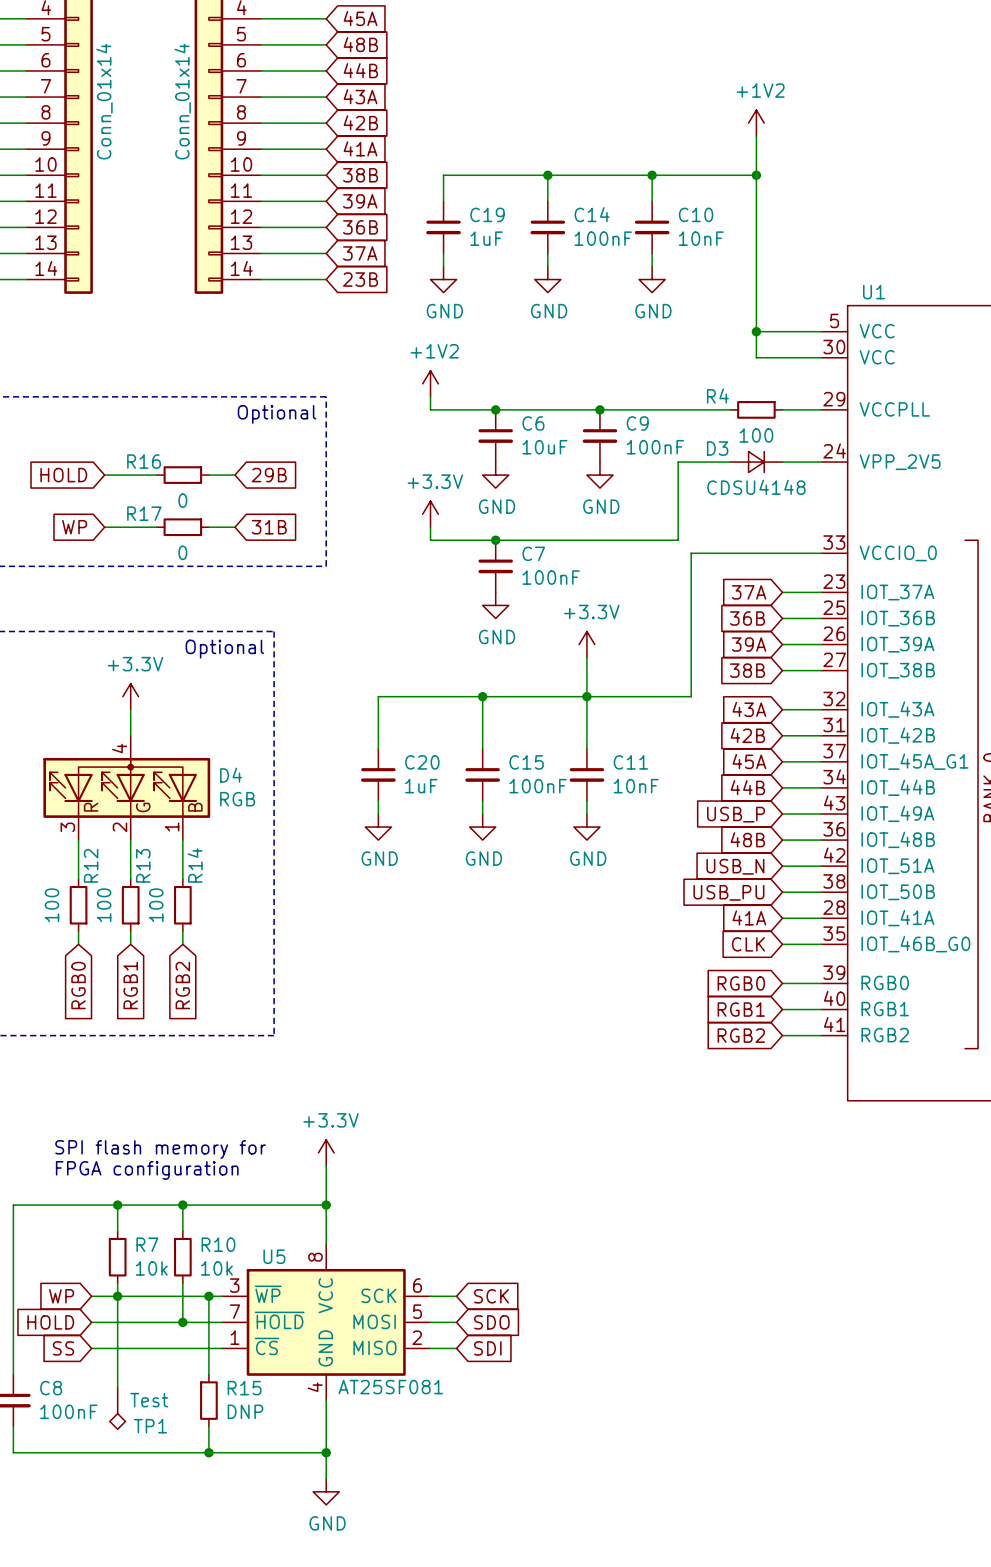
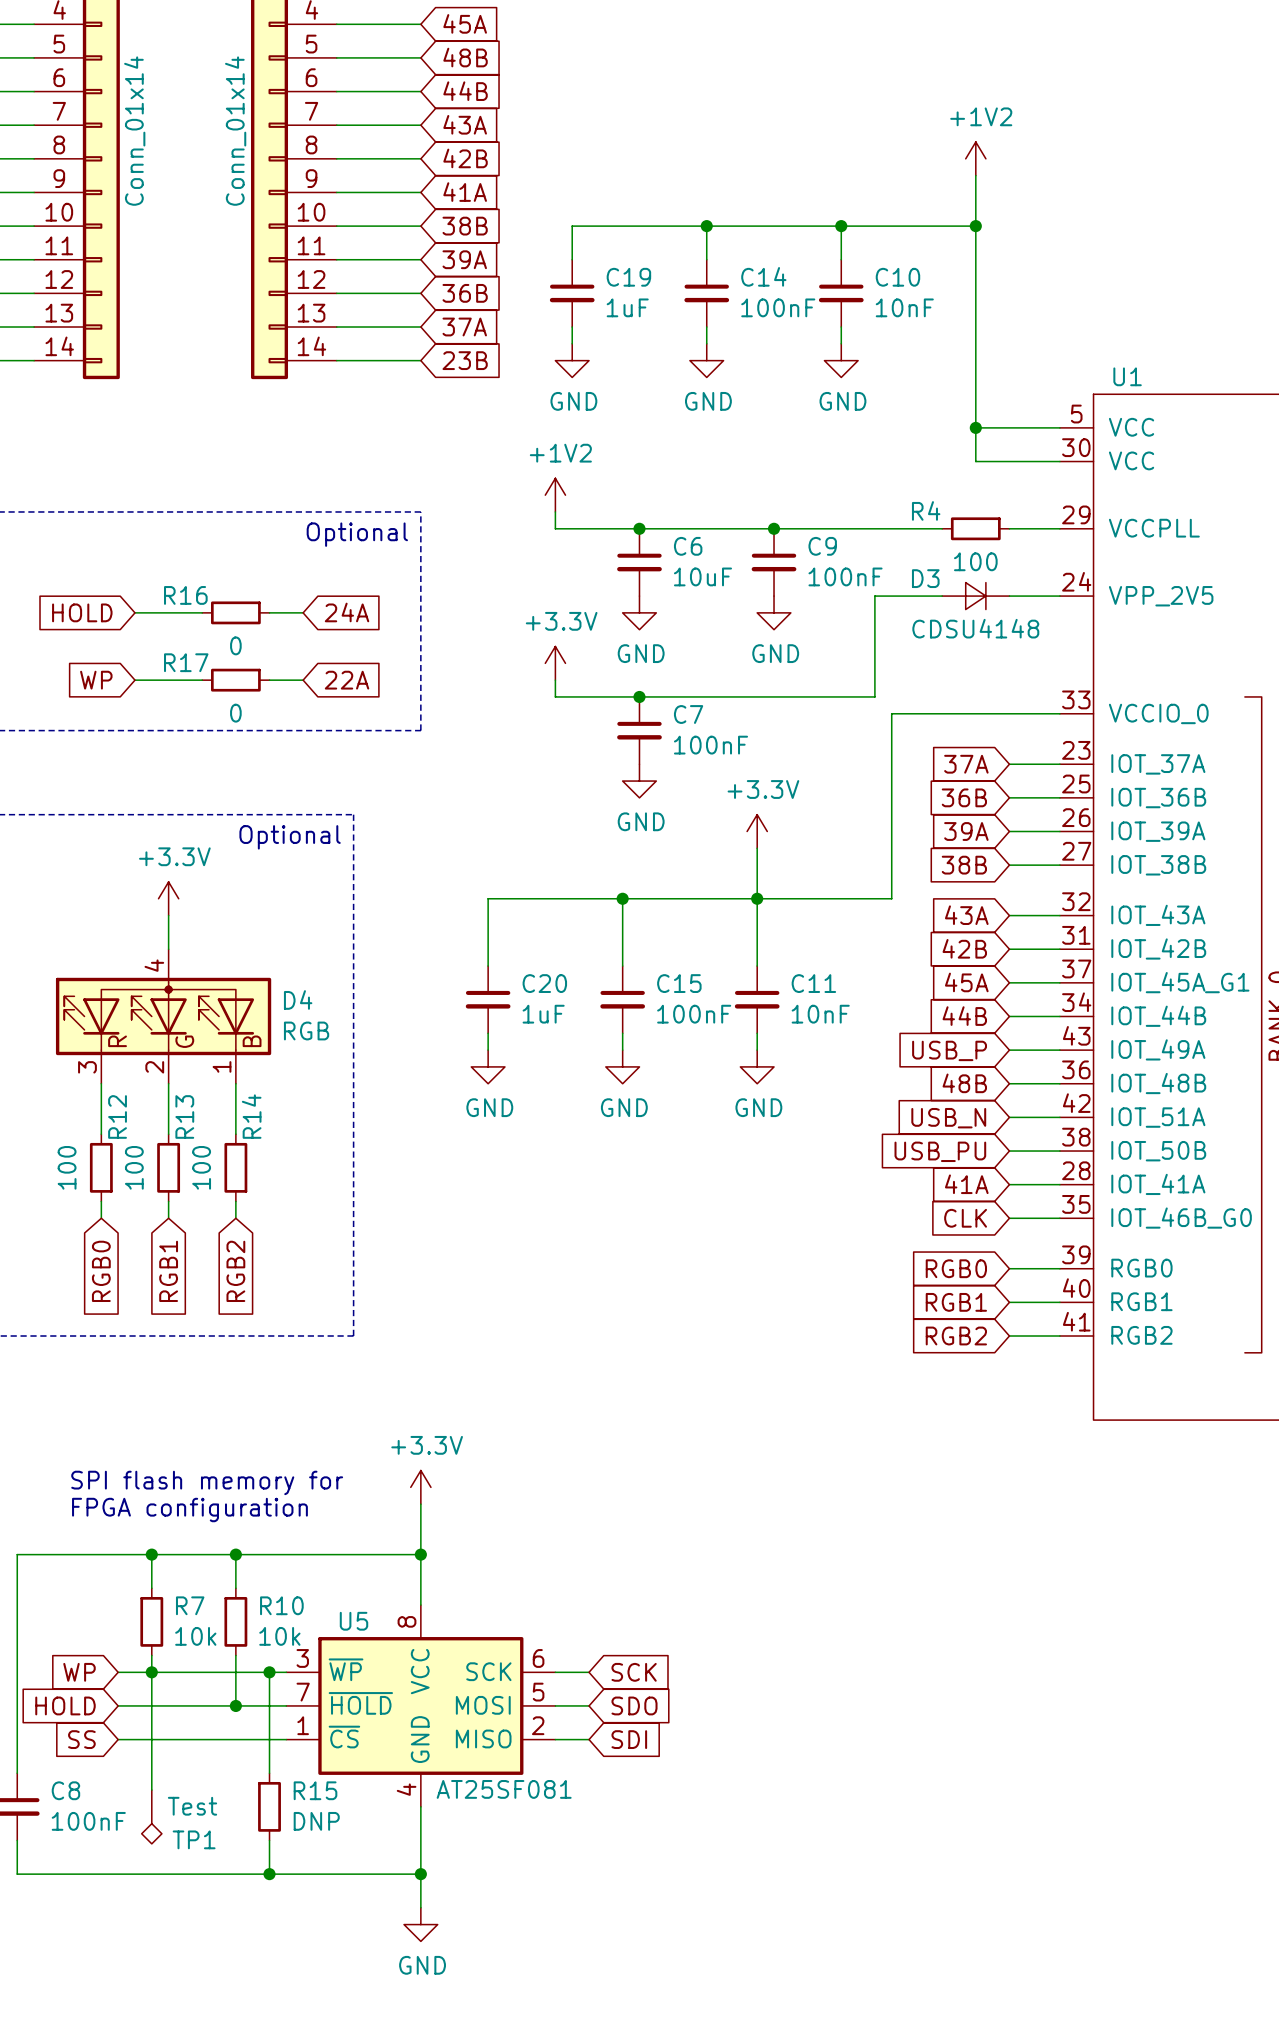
global label: 29B (269, 475) -> 24A (347, 612)
global label: 31B (269, 527) -> 22A (347, 680)

